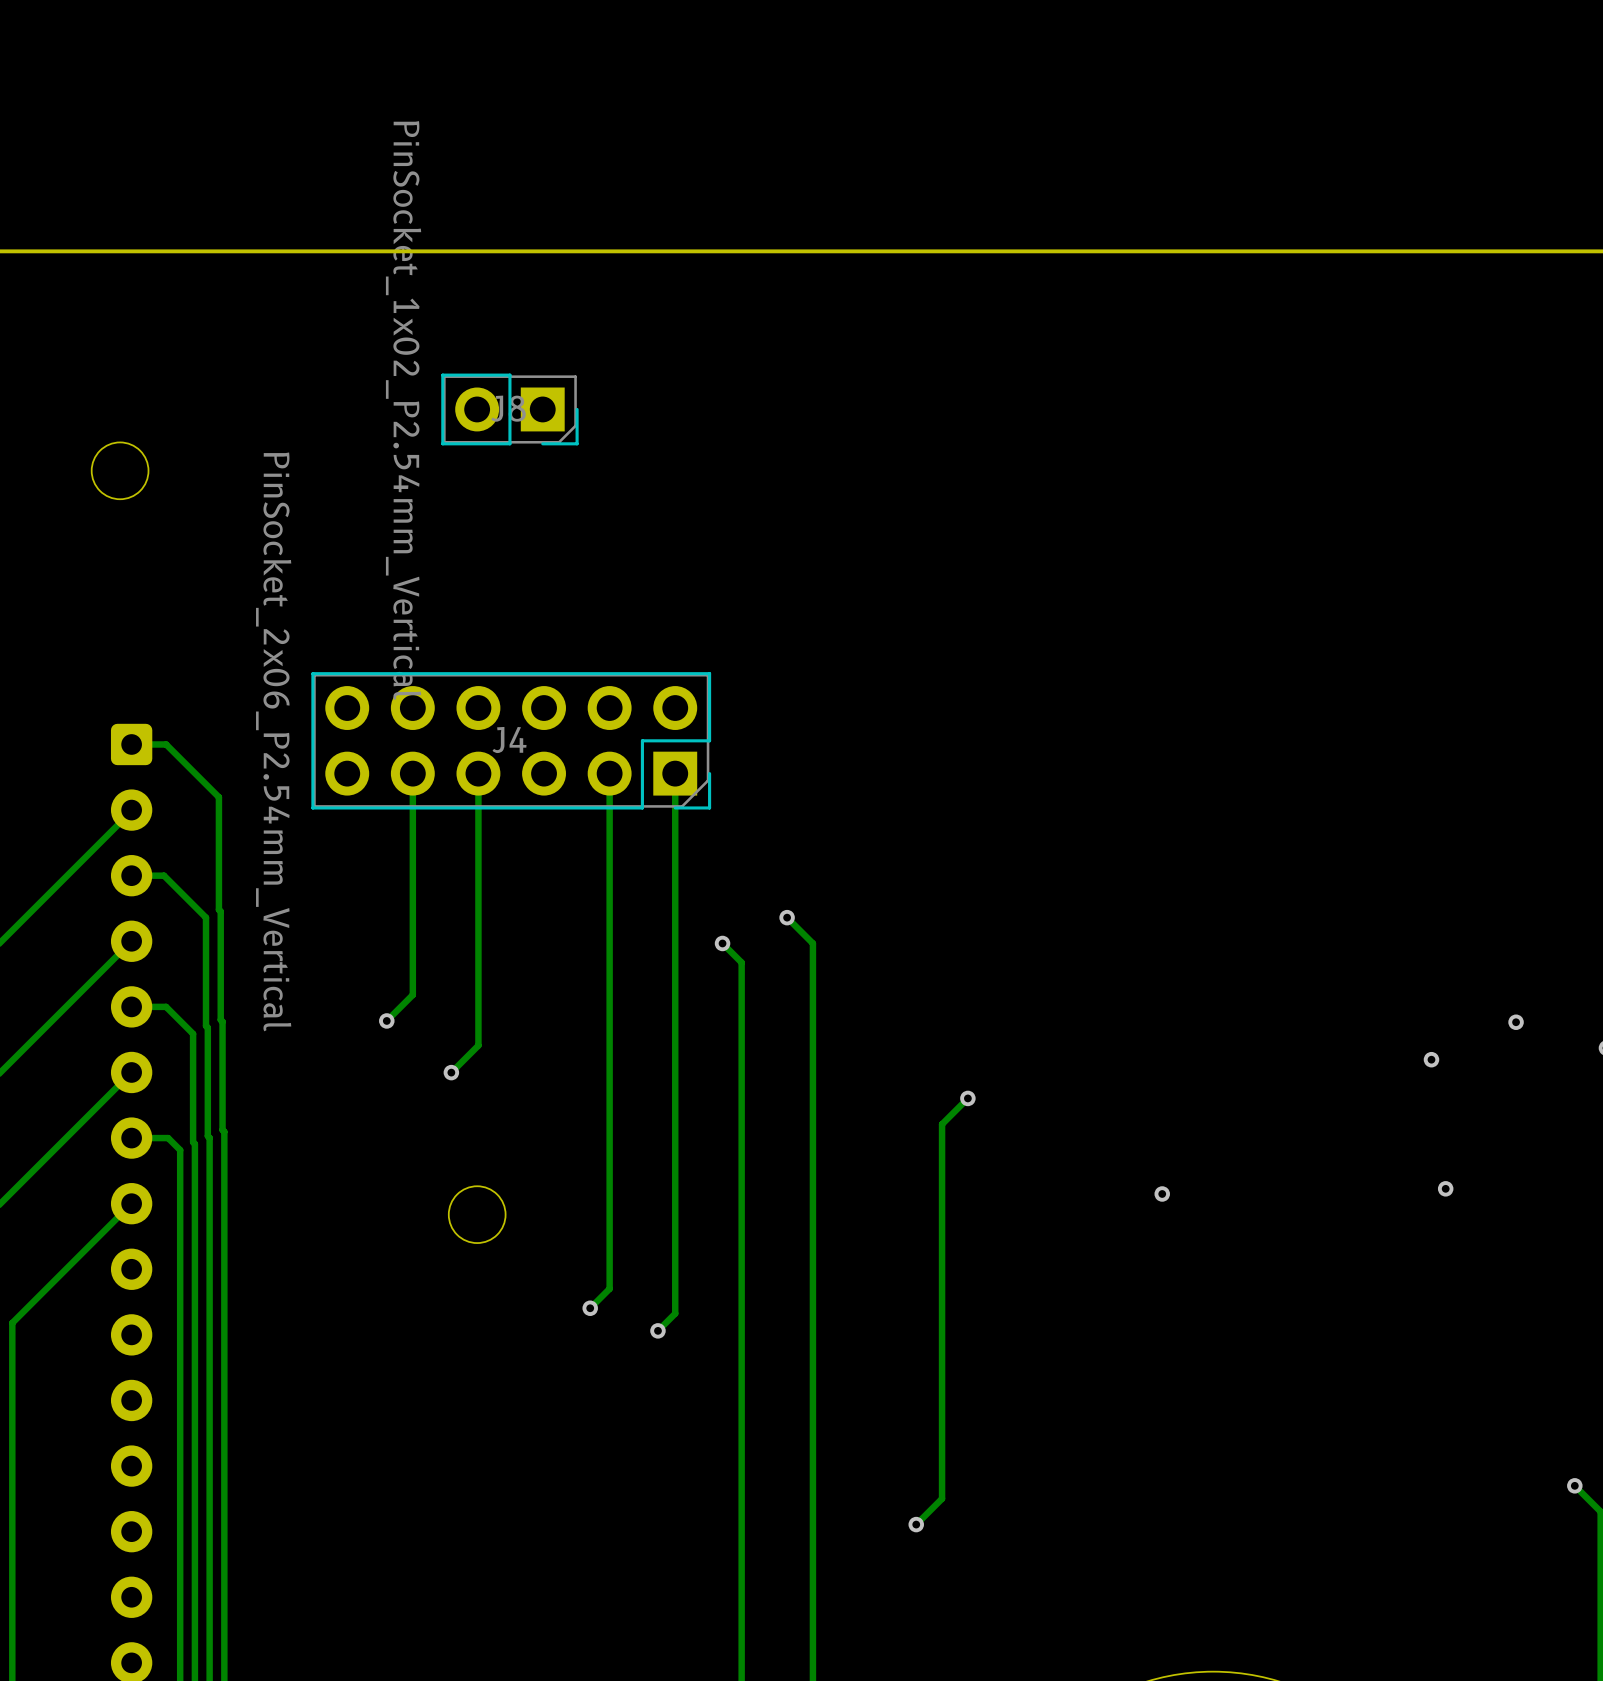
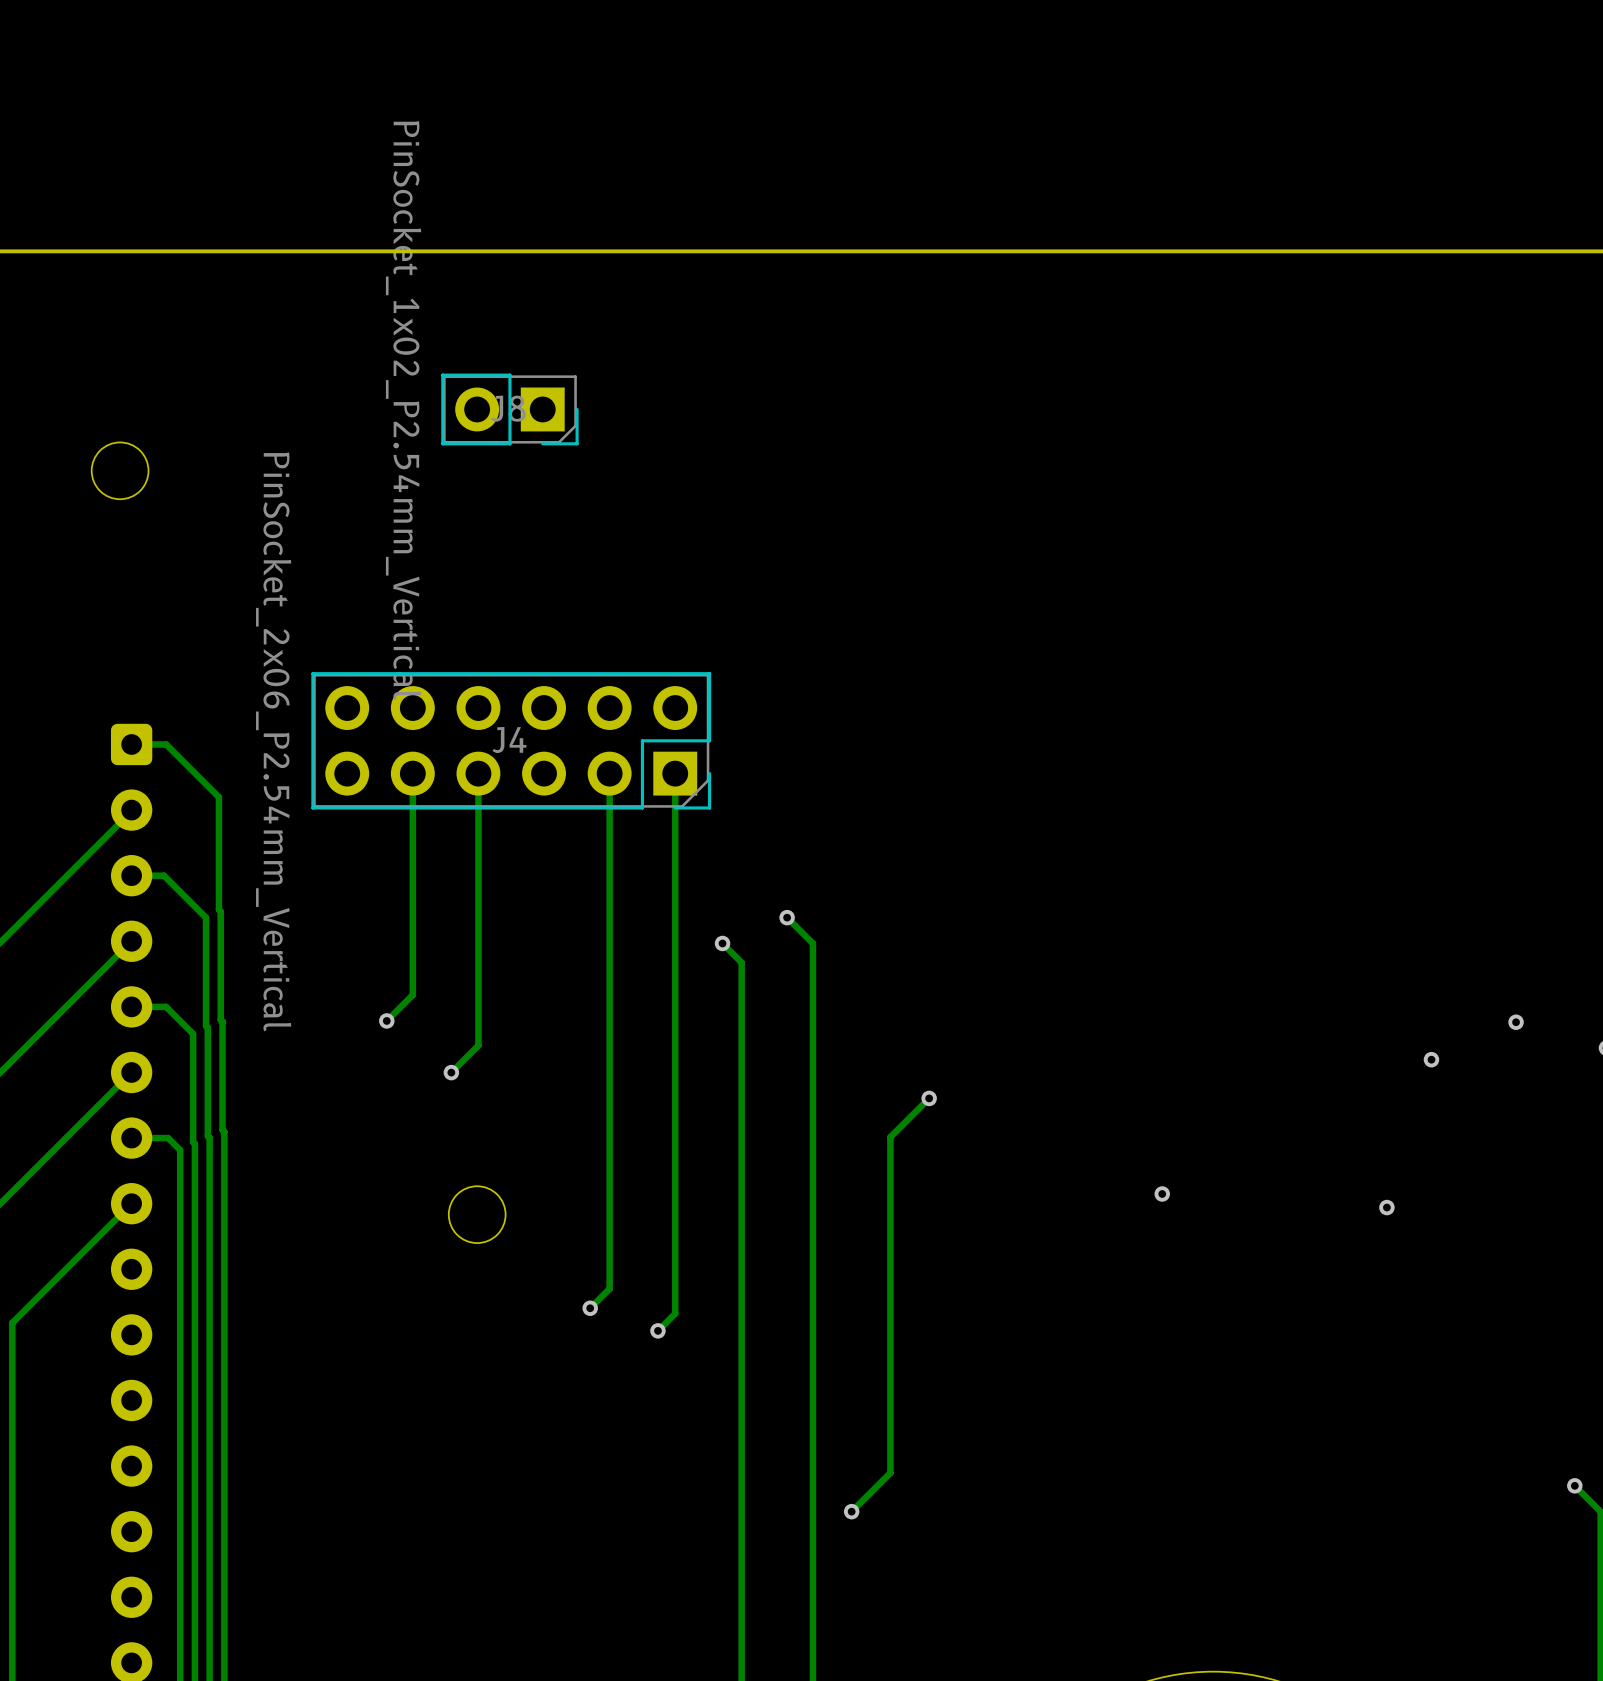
track: none -> (929, 1098) (890, 1137) (890, 1472) (851, 1511)
track: (967, 1098) (942, 1124) (942, 1498) (916, 1524) -> none
via position: (967, 1098) -> (929, 1098)
via position: (1445, 1188) -> (1386, 1207)
via position: (916, 1524) -> (851, 1511)

